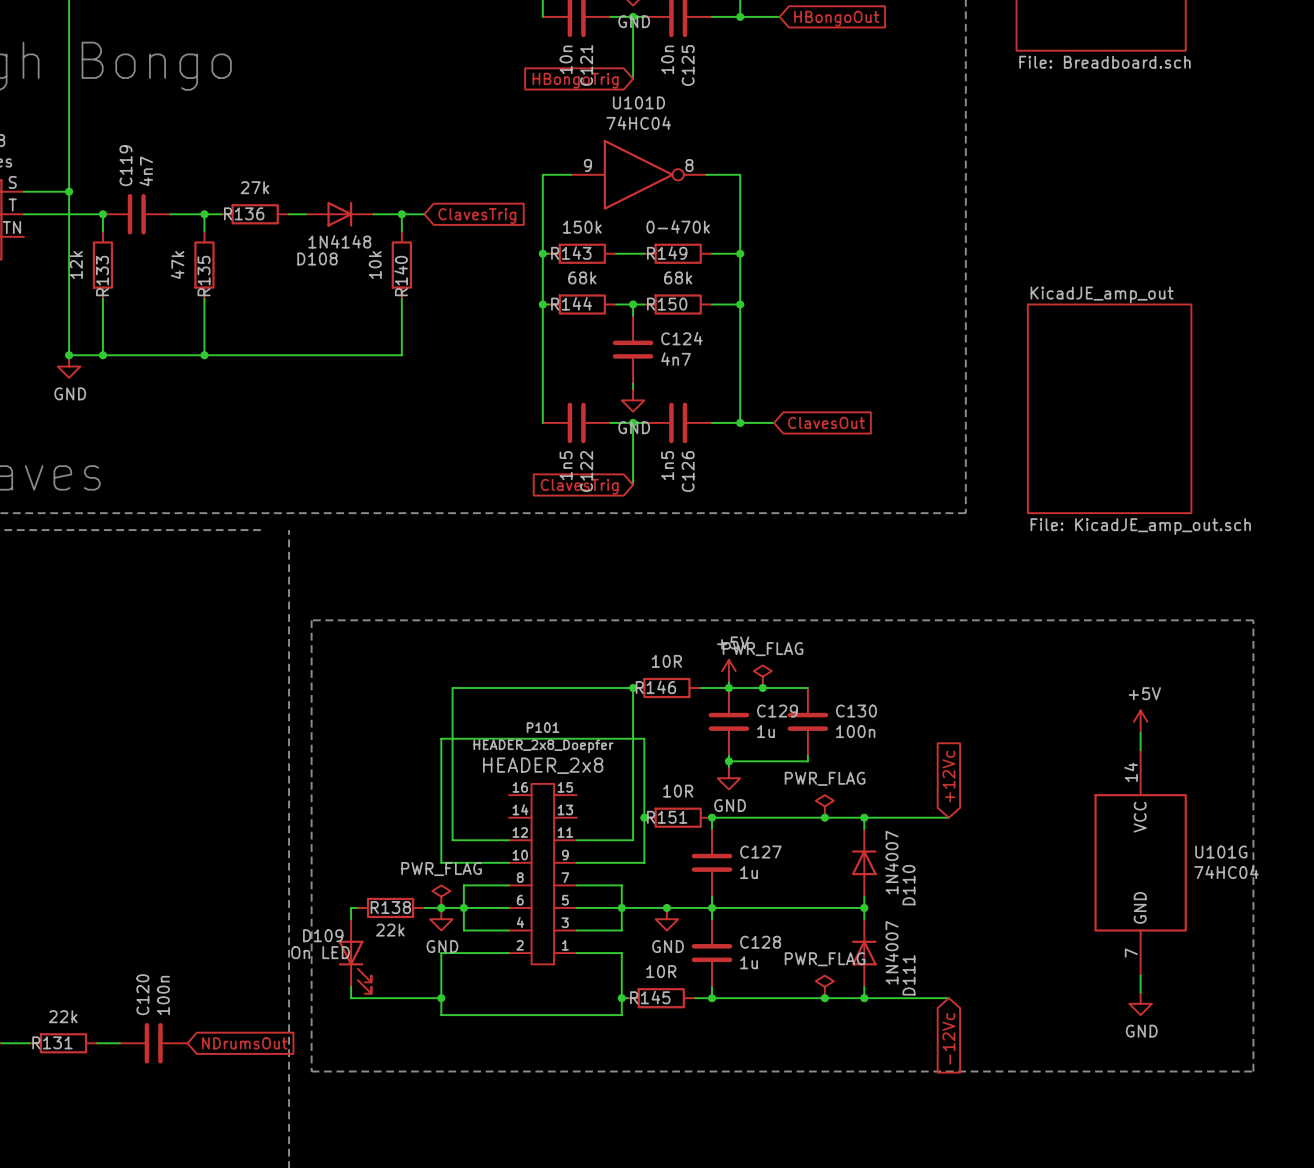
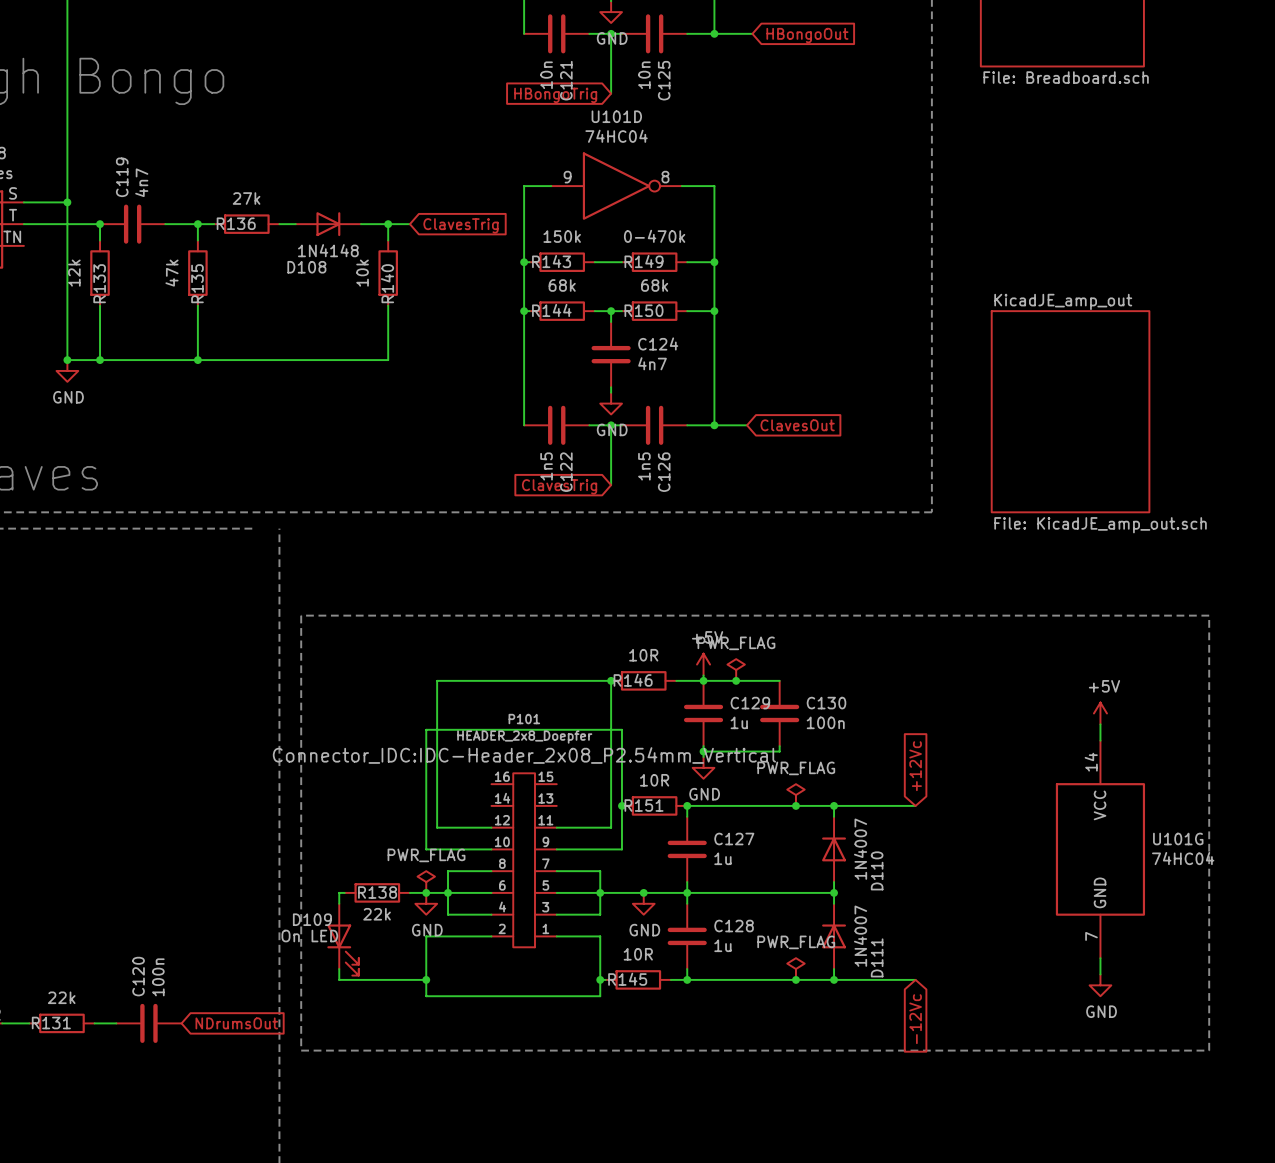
P101 text: HEADER_2x8 (543, 765) -> Connector_IDC:IDC-Header_2x08_P2.54mm_Vertical (524, 755)

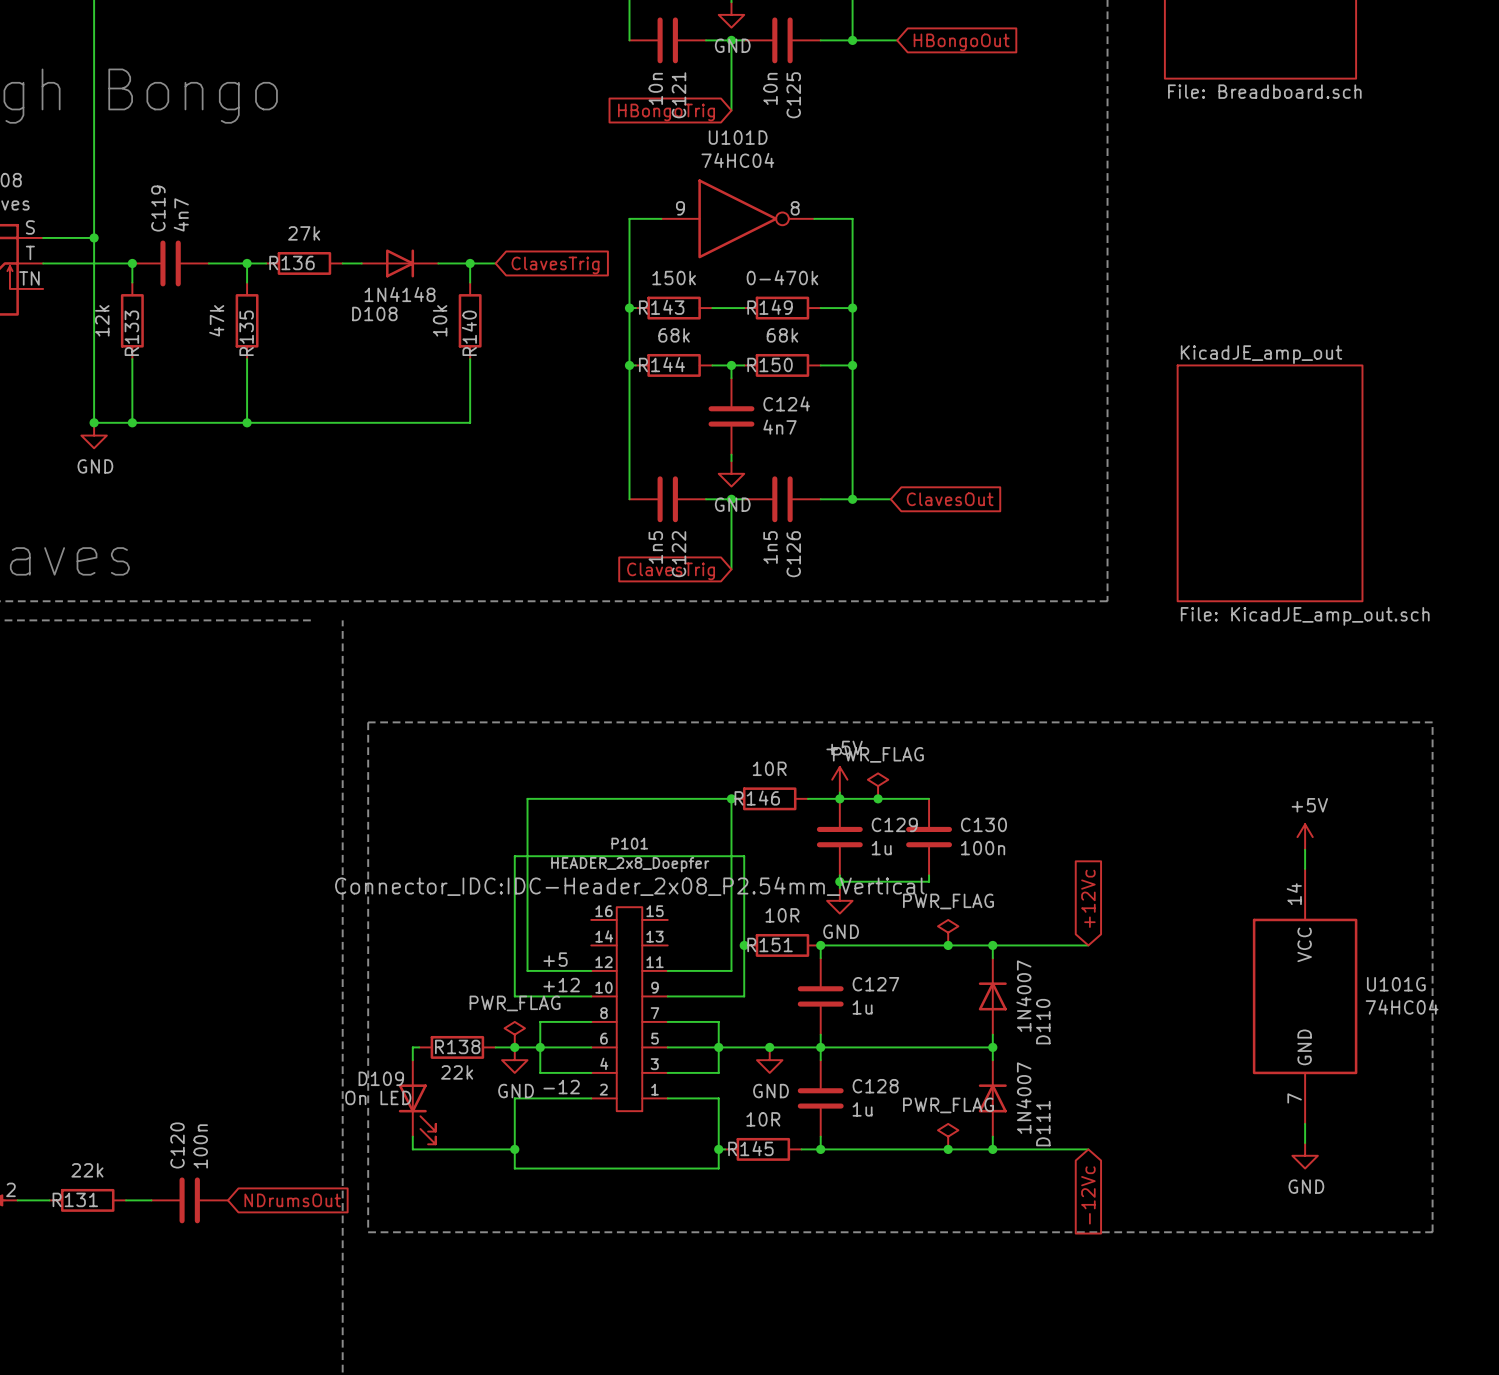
label: none -> +5 (555, 959)
label: none -> +12 (561, 985)
label: none -> -12 (561, 1087)

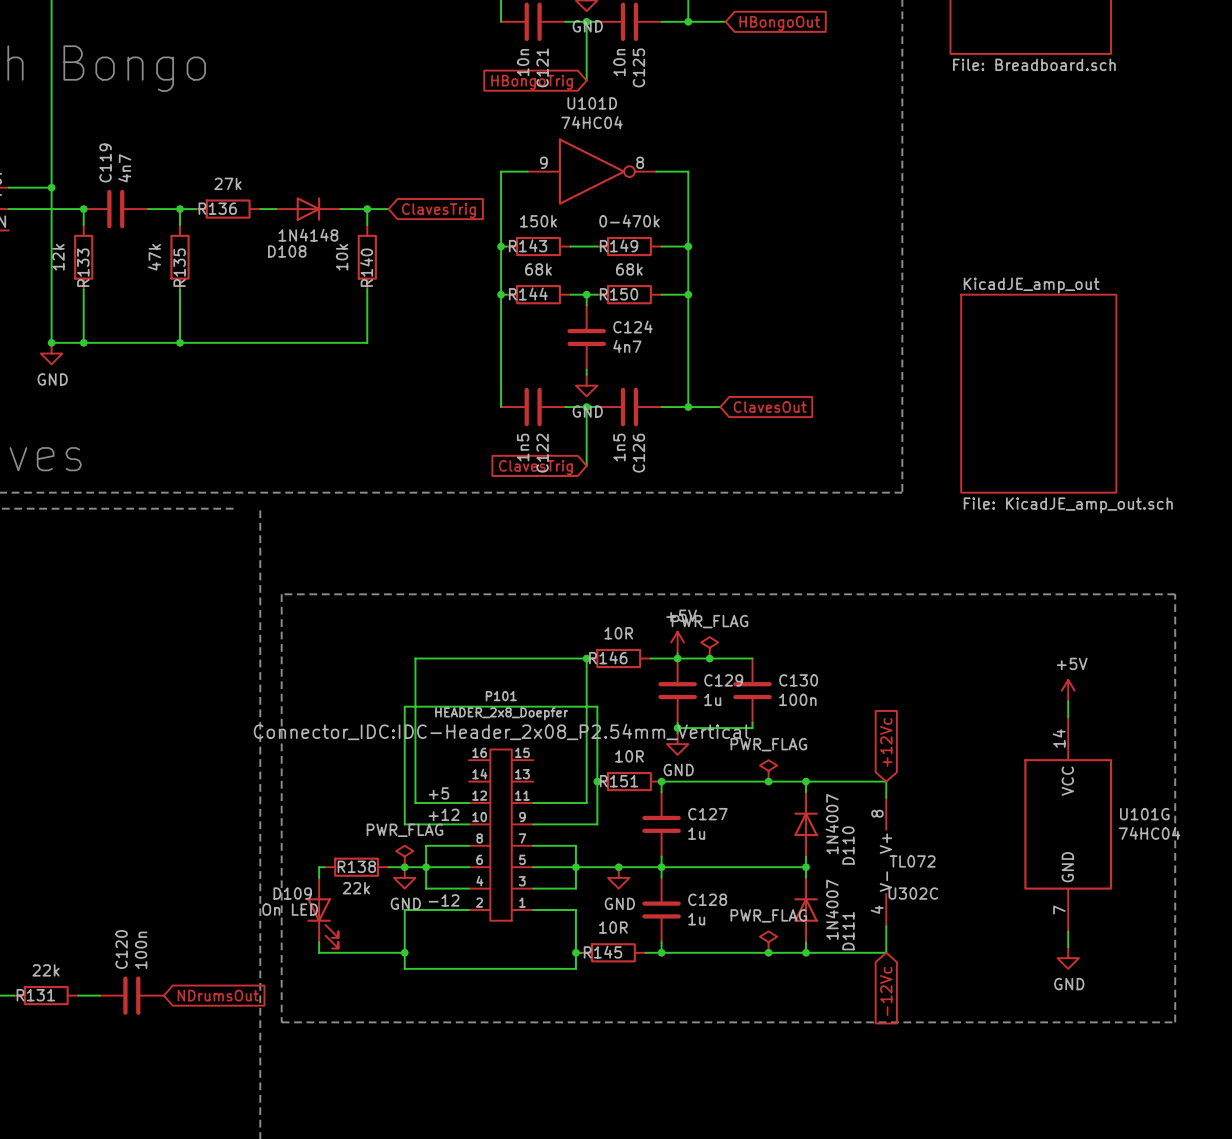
wire: none -> (886, 781) (886, 797)
U302C: none -> TL072 (886, 861)
wire: none -> (886, 926) (886, 952)

